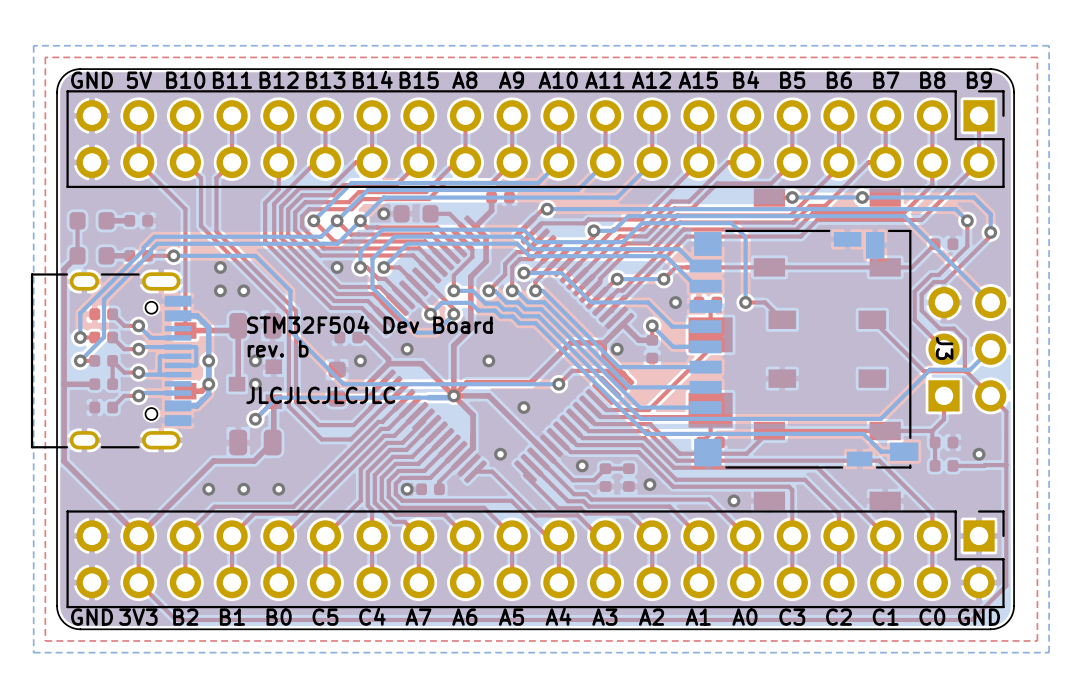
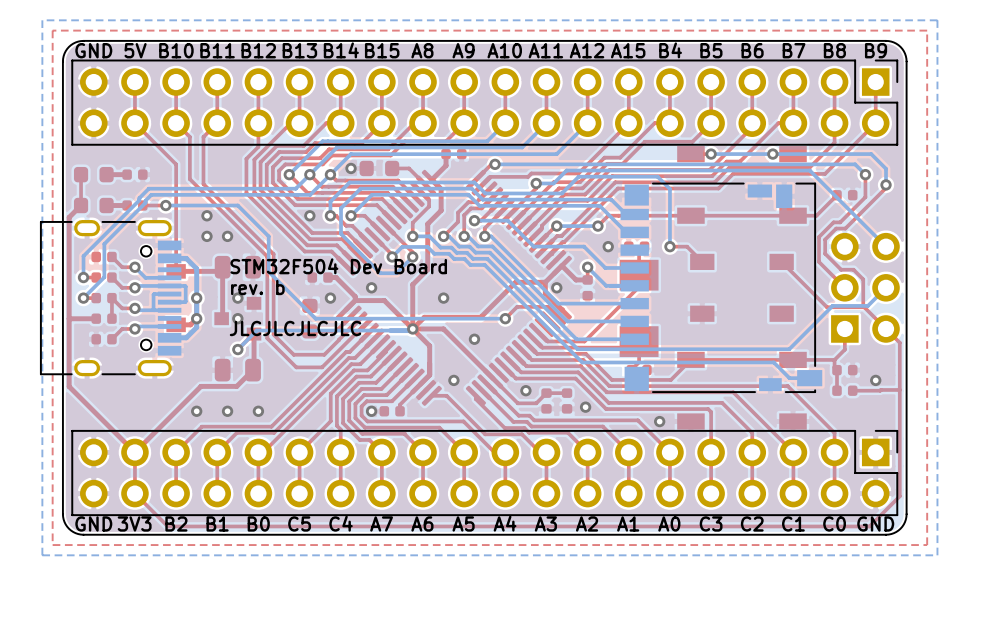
J3 name: J3 (944, 348) -> none

